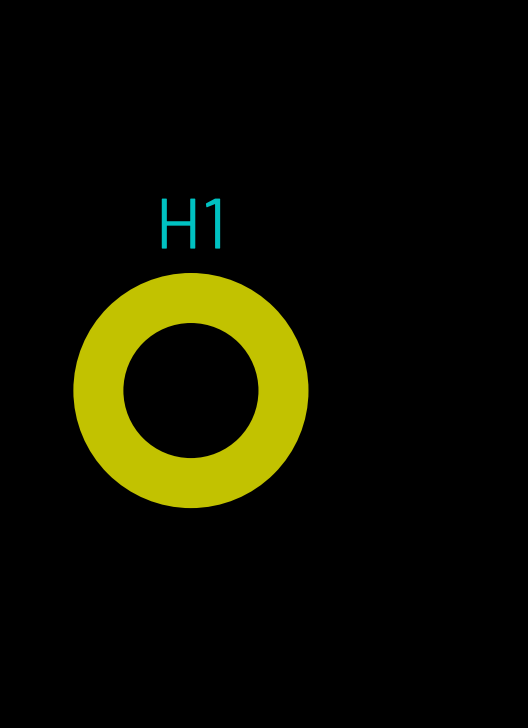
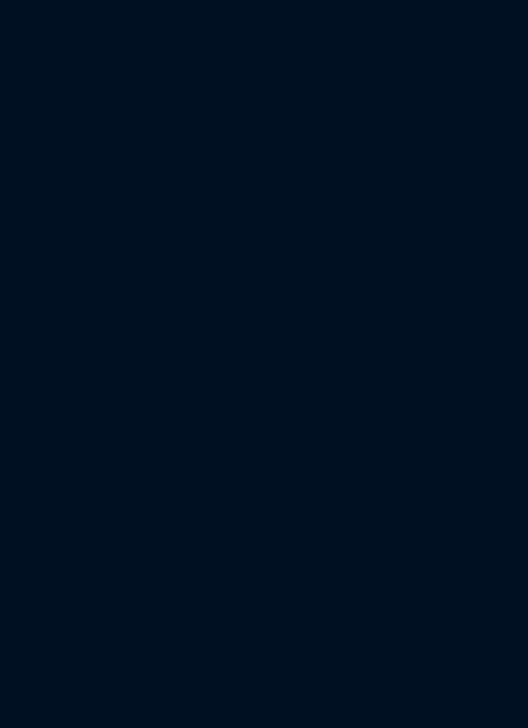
H1: (190, 390) -> none

